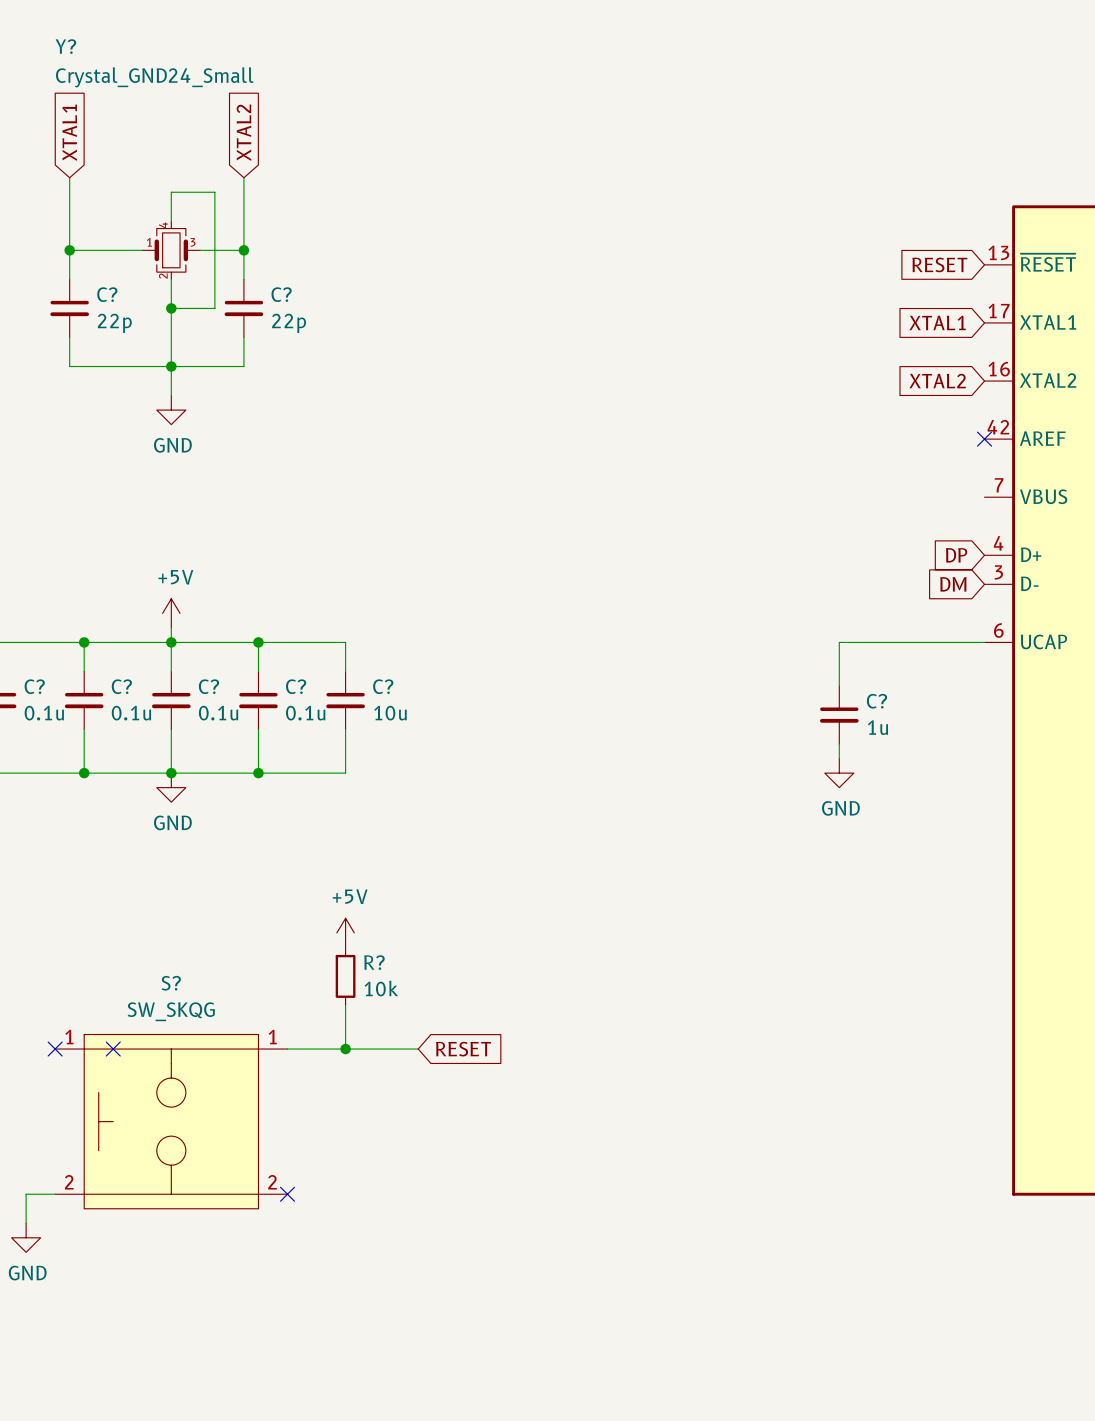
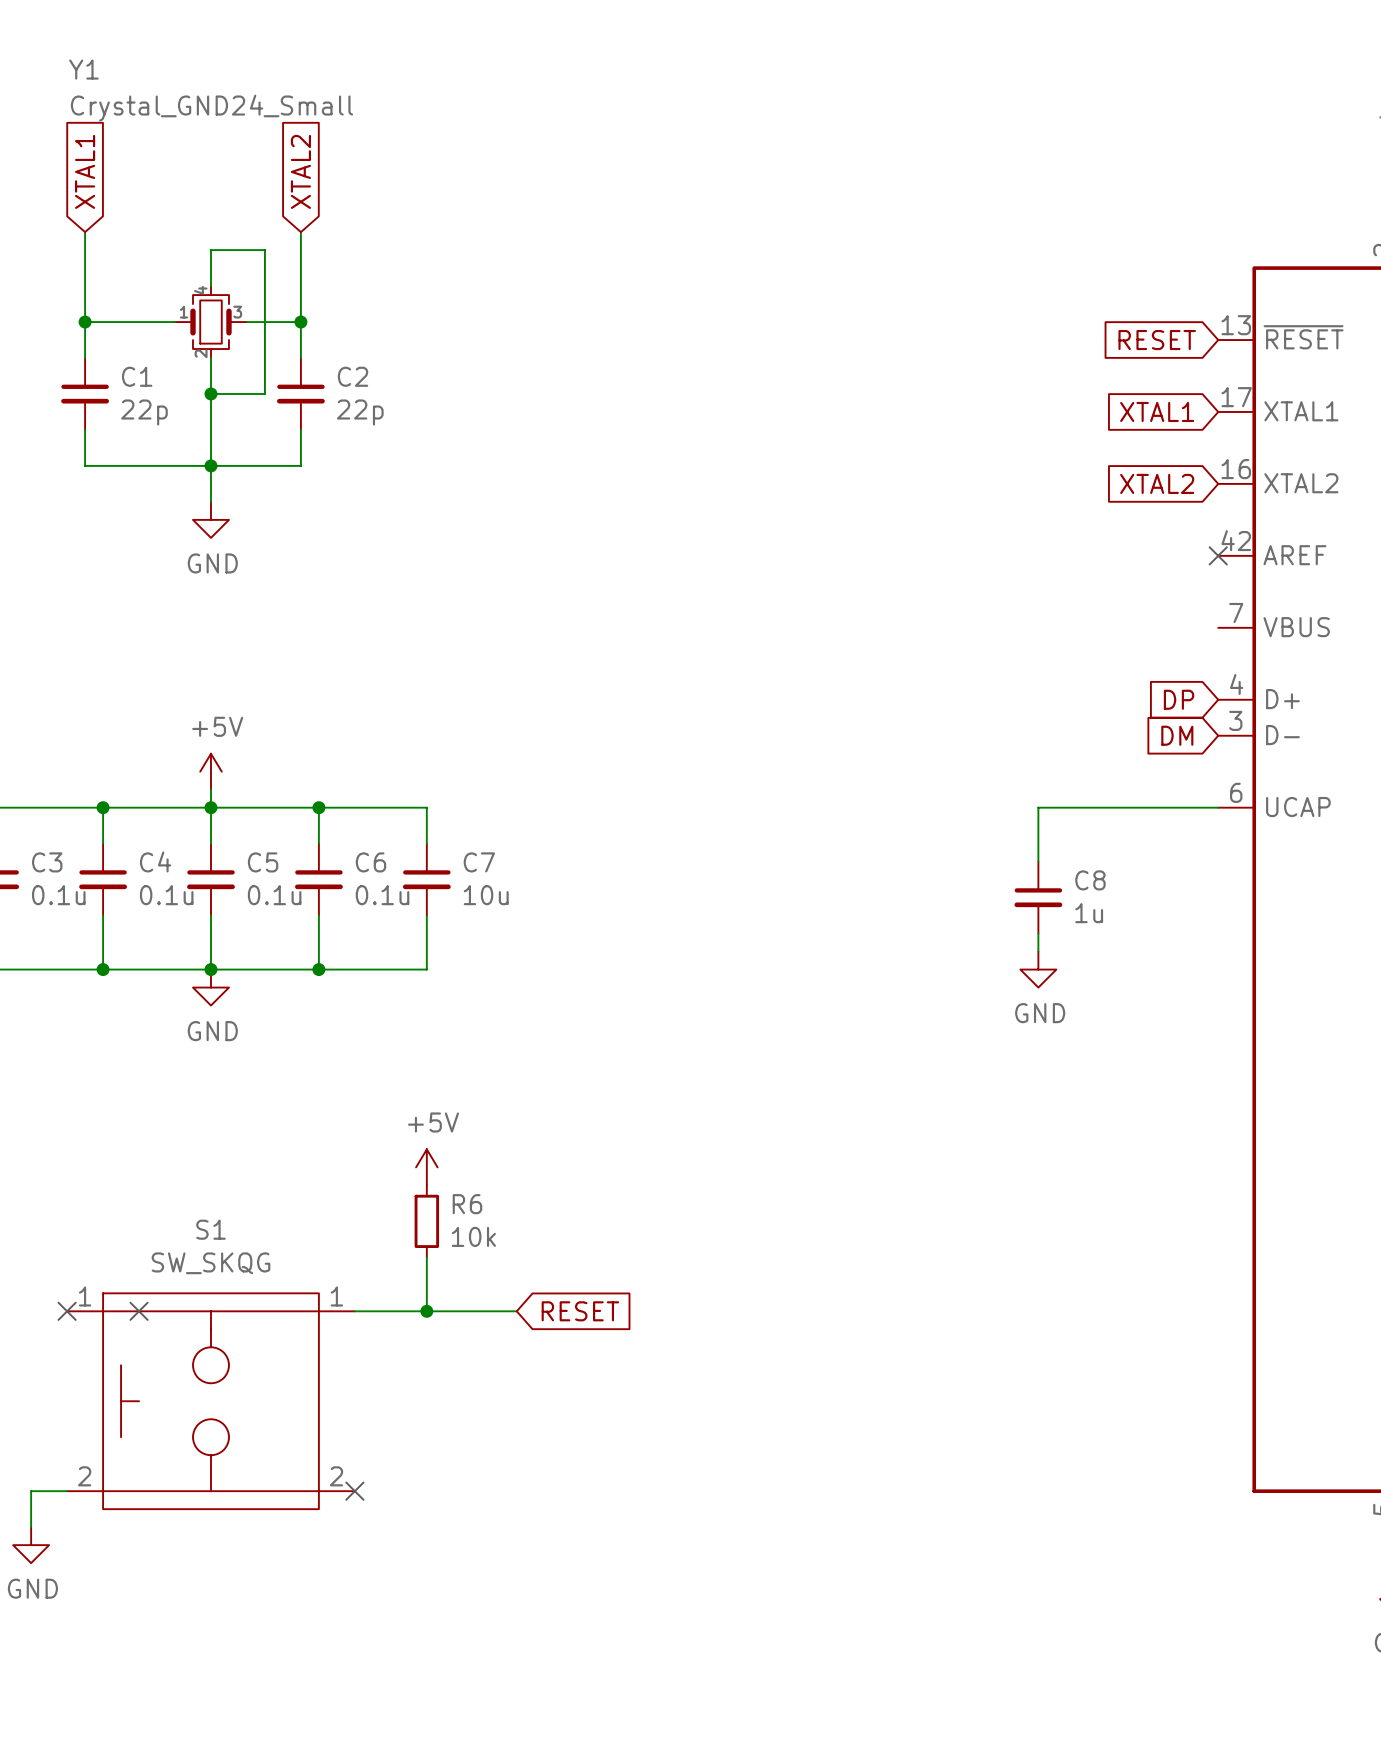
Y? name: Y? (65, 46) -> Y1 (83, 69)
C? name: C? (107, 294) -> C1 (137, 376)
C? name: C? (281, 294) -> C2 (353, 376)
C? name: C? (34, 686) -> C3 (47, 862)
C? name: C? (121, 686) -> C4 (155, 861)
C? name: C? (208, 686) -> C5 (263, 862)
C? name: C? (296, 686) -> C6 (370, 862)
C? name: C? (383, 686) -> C7 (479, 862)
C? name: C? (876, 701) -> C8 (1090, 880)
R? name: R? (374, 962) -> R6 (467, 1204)
S? name: S? (171, 983) -> S1 (210, 1229)

